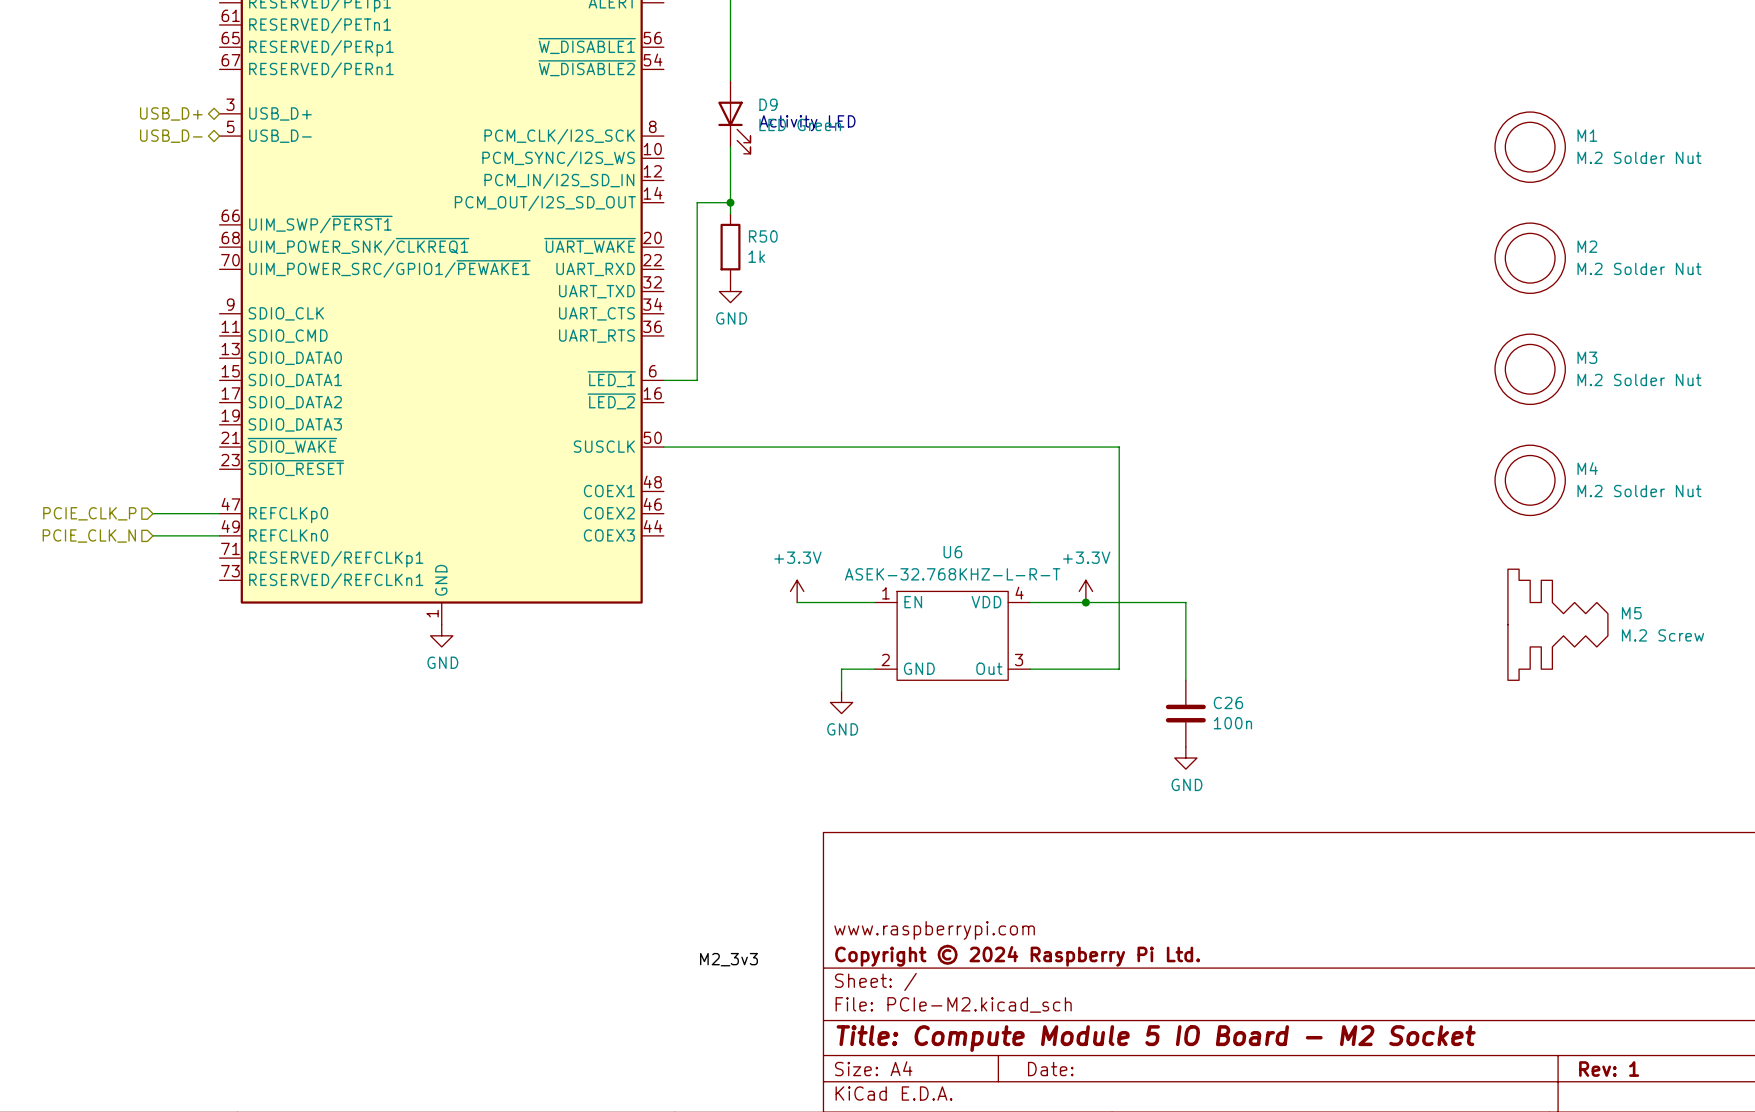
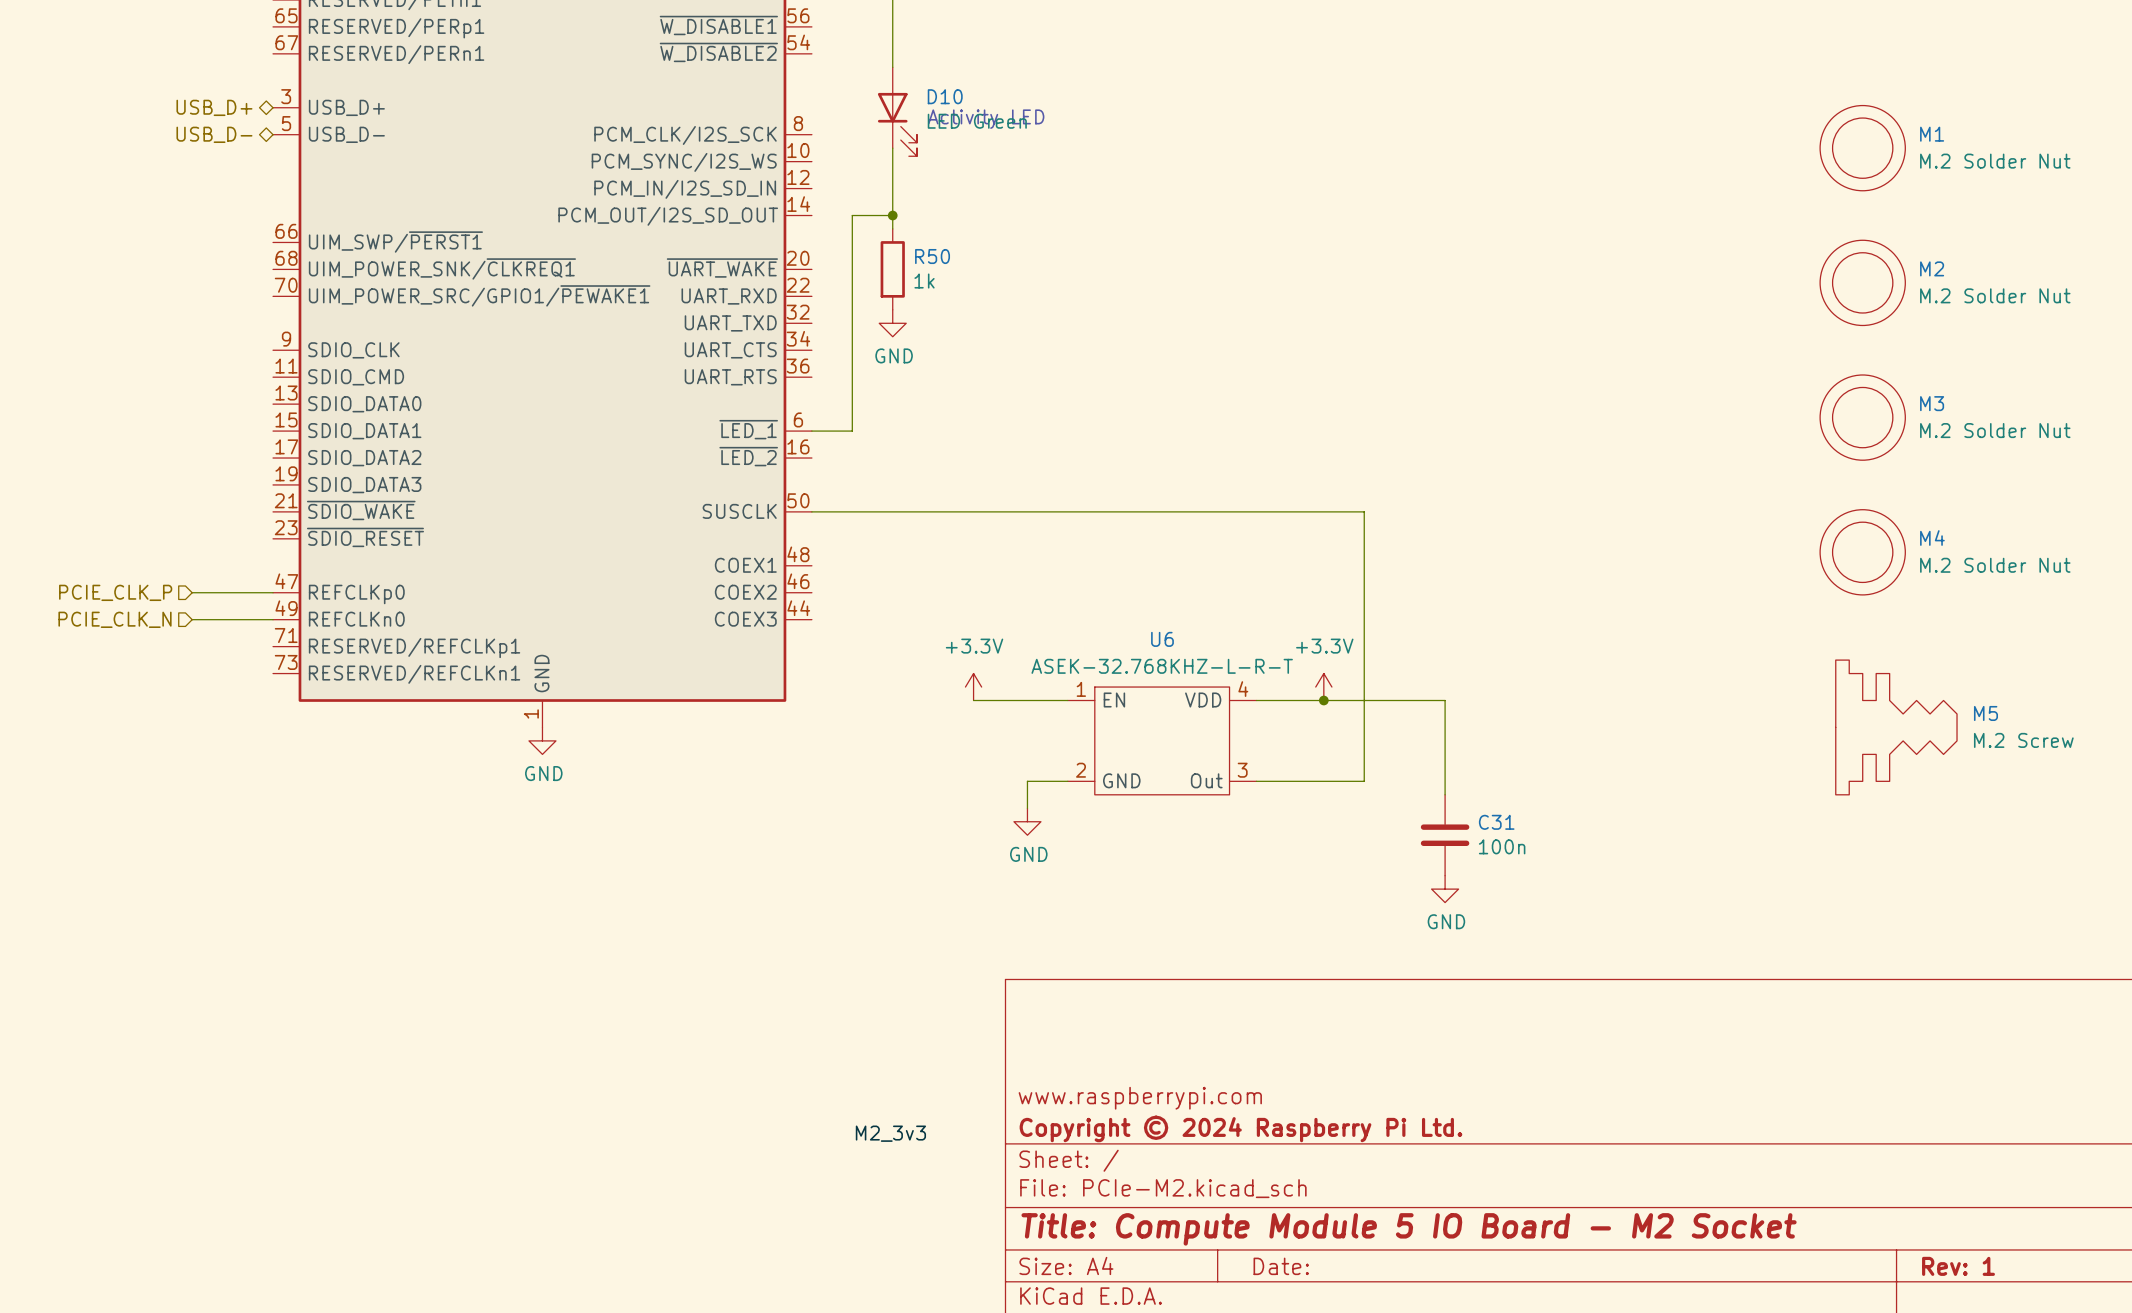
D9 name: D9 (768, 104) -> D10 (945, 96)
C26 name: C26 (1228, 702) -> C31 (1496, 822)

